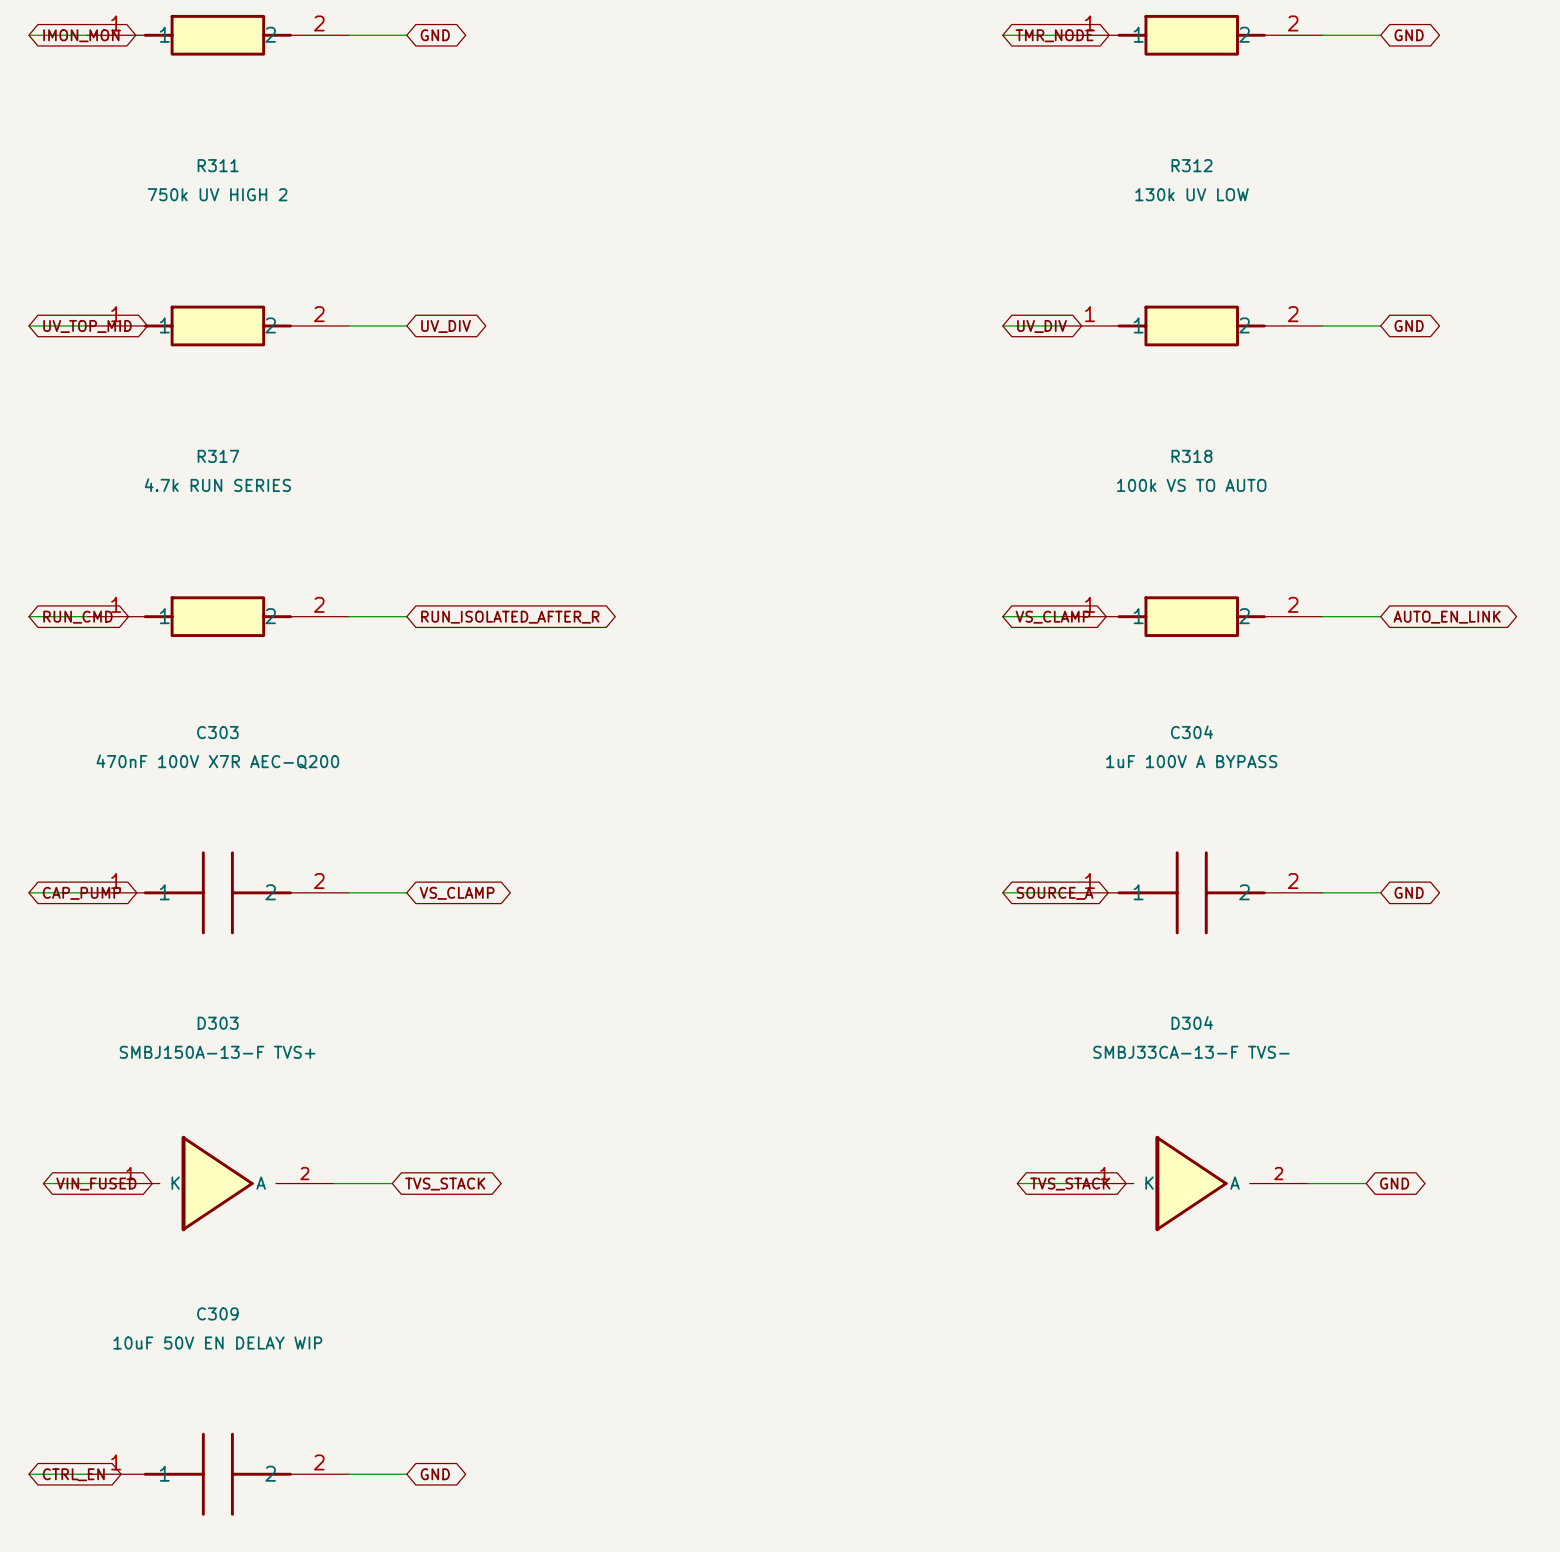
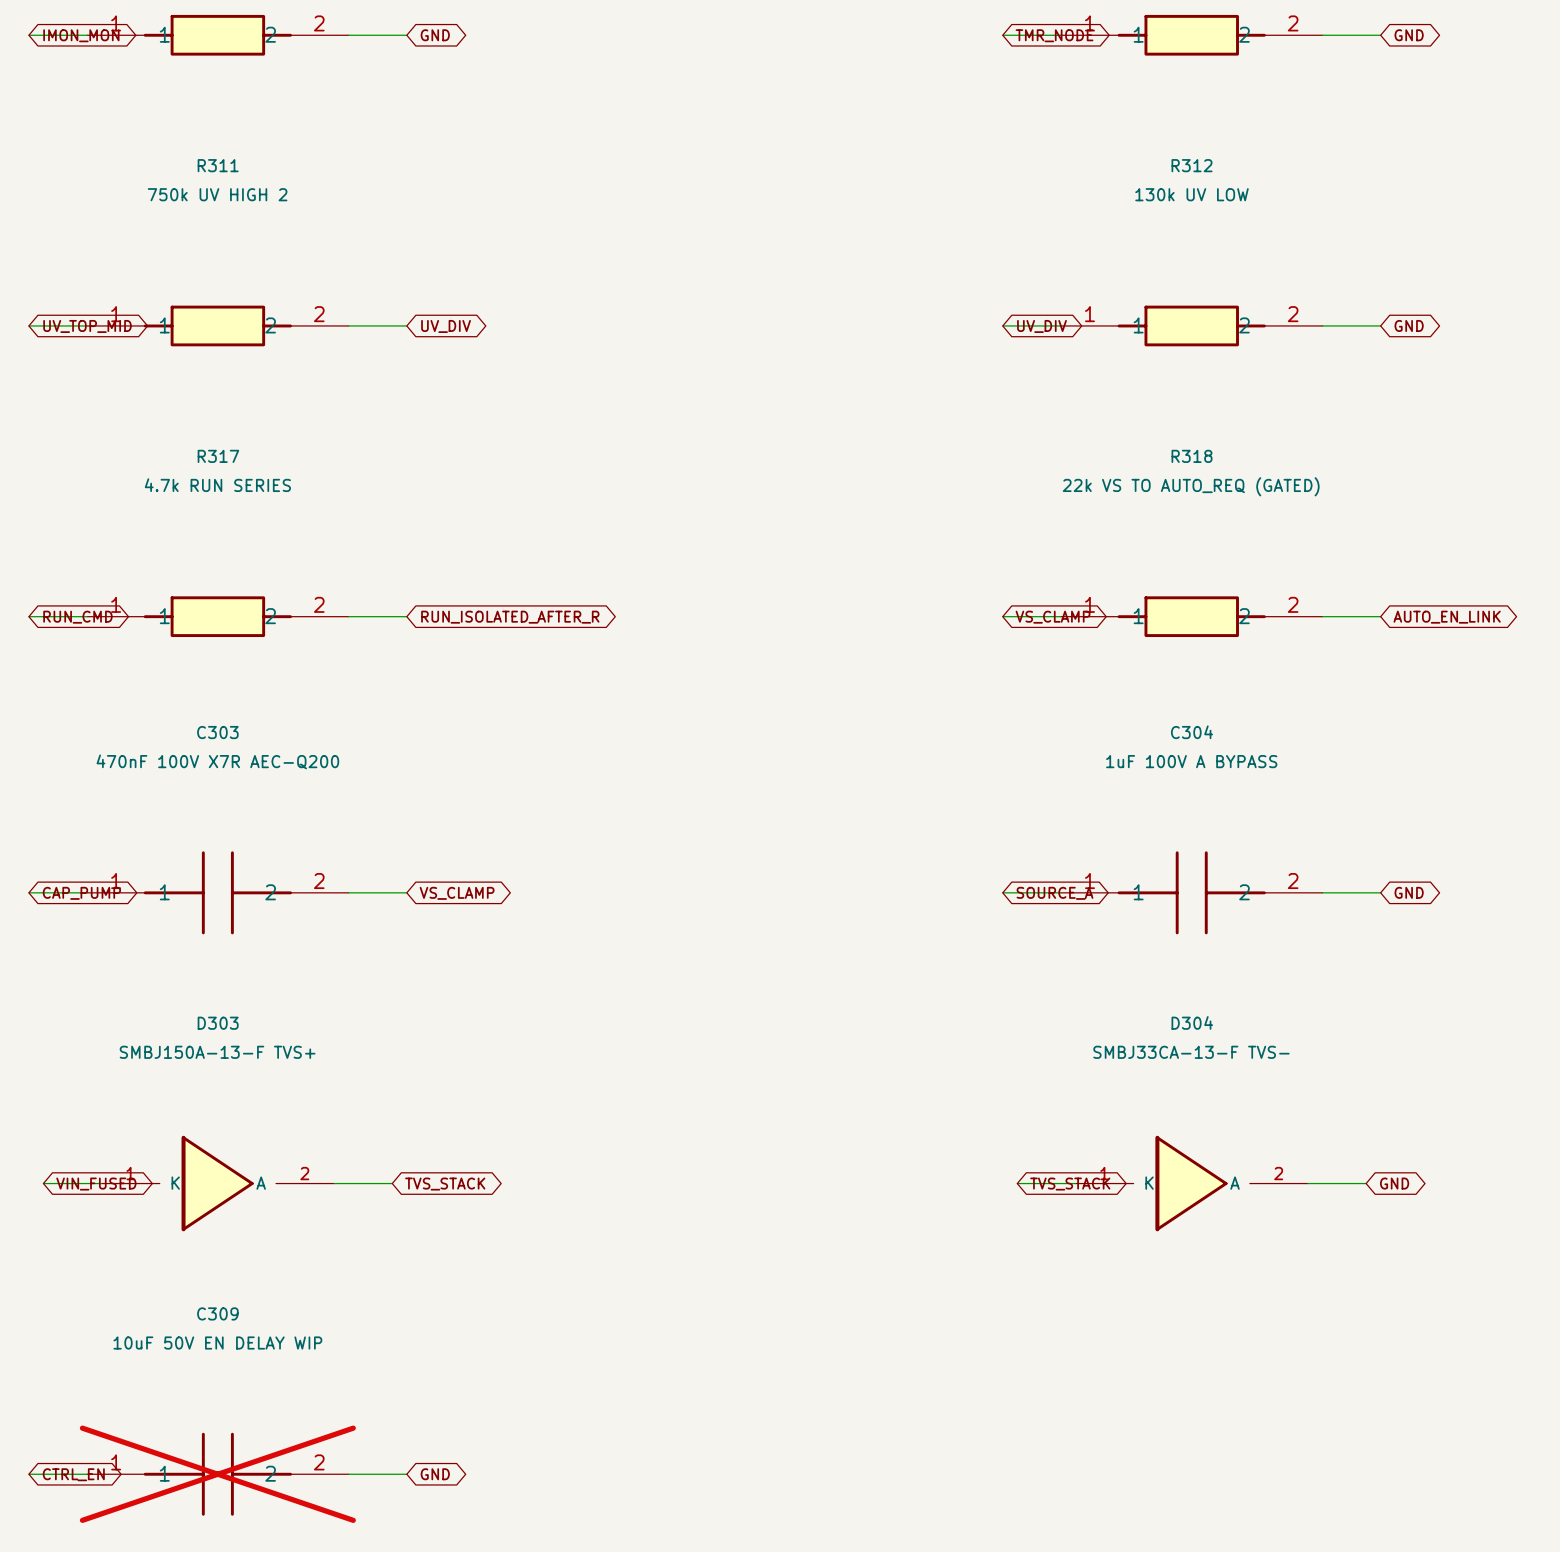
R318 value: 100k VS TO AUTO (1191, 485) -> 22k VS TO AUTO_REQ (GATED) (1191, 486)
C309 do-not-place cross: none -> (217, 1474)

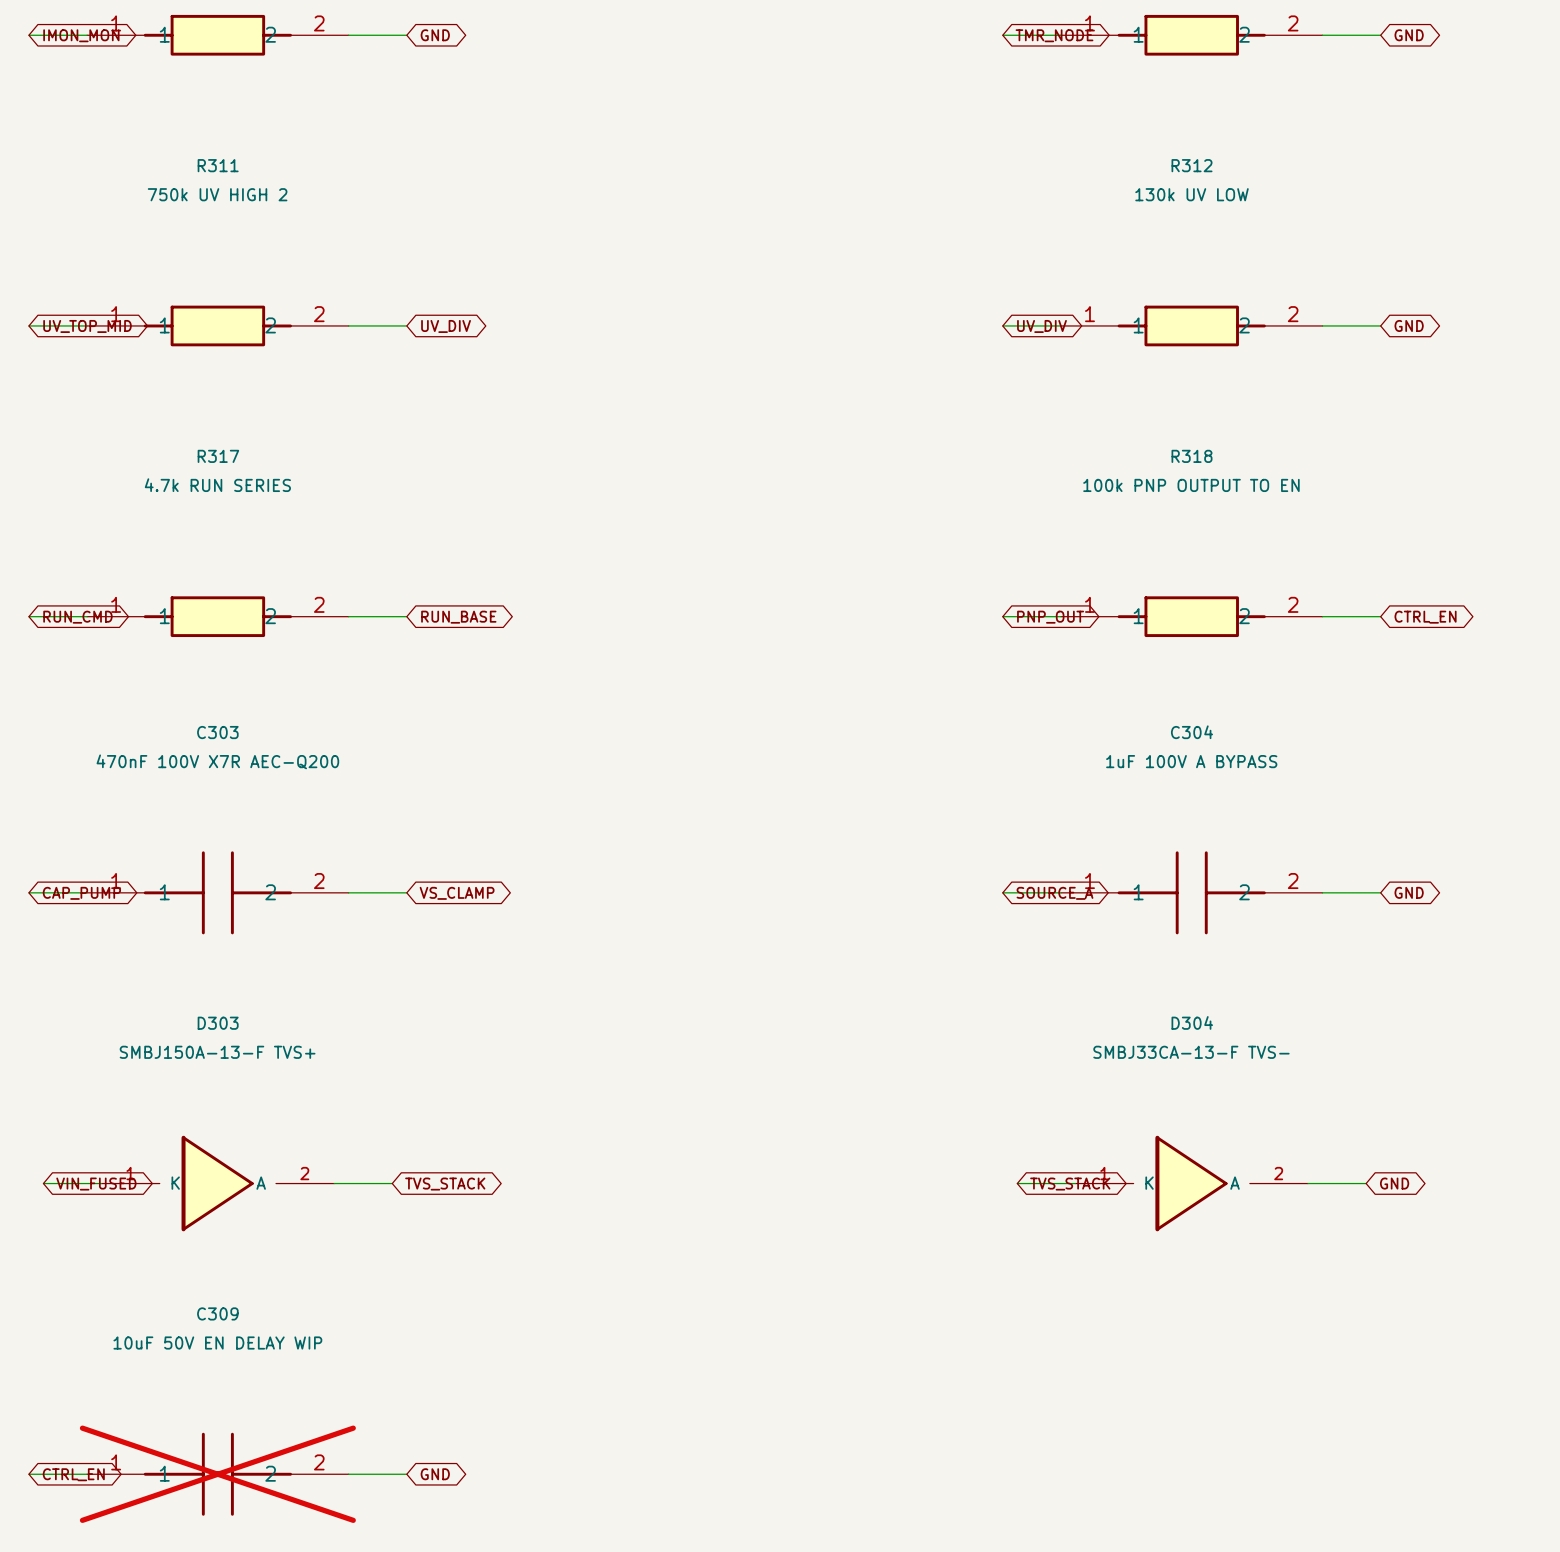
R318 value: 22k VS TO AUTO_REQ (GATED) (1191, 486) -> 100k PNP OUTPUT TO EN (1191, 485)
global label: RUN_ISOLATED_AFTER_R (510, 617) -> RUN_BASE (458, 617)
global label: VS_CLAMP (1053, 617) -> PNP_OUT (1050, 617)
global label: AUTO_EN_LINK (1447, 617) -> CTRL_EN (1425, 617)

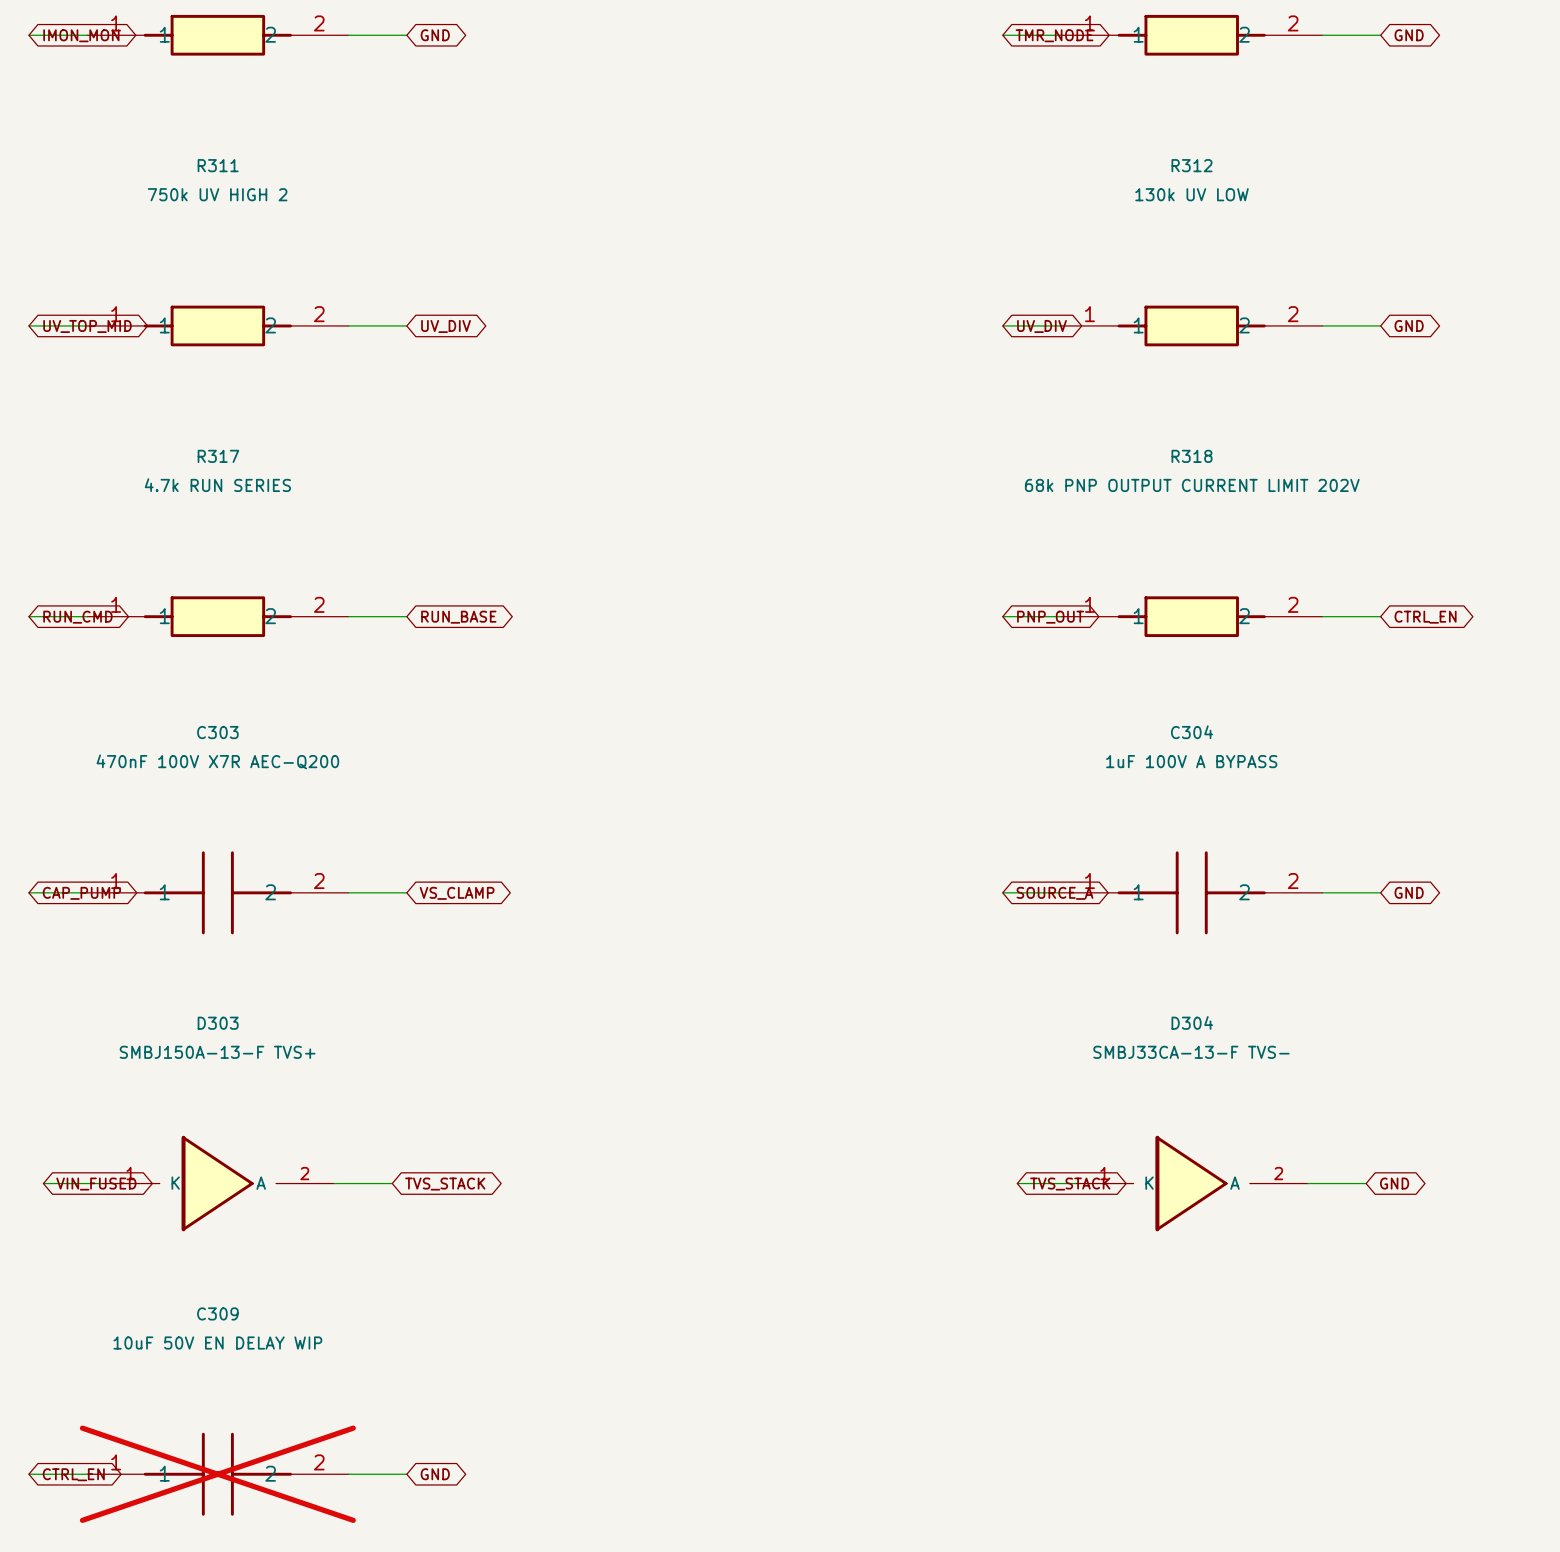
R318 value: 100k PNP OUTPUT TO EN (1191, 485) -> 68k PNP OUTPUT CURRENT LIMIT 202V (1192, 485)

